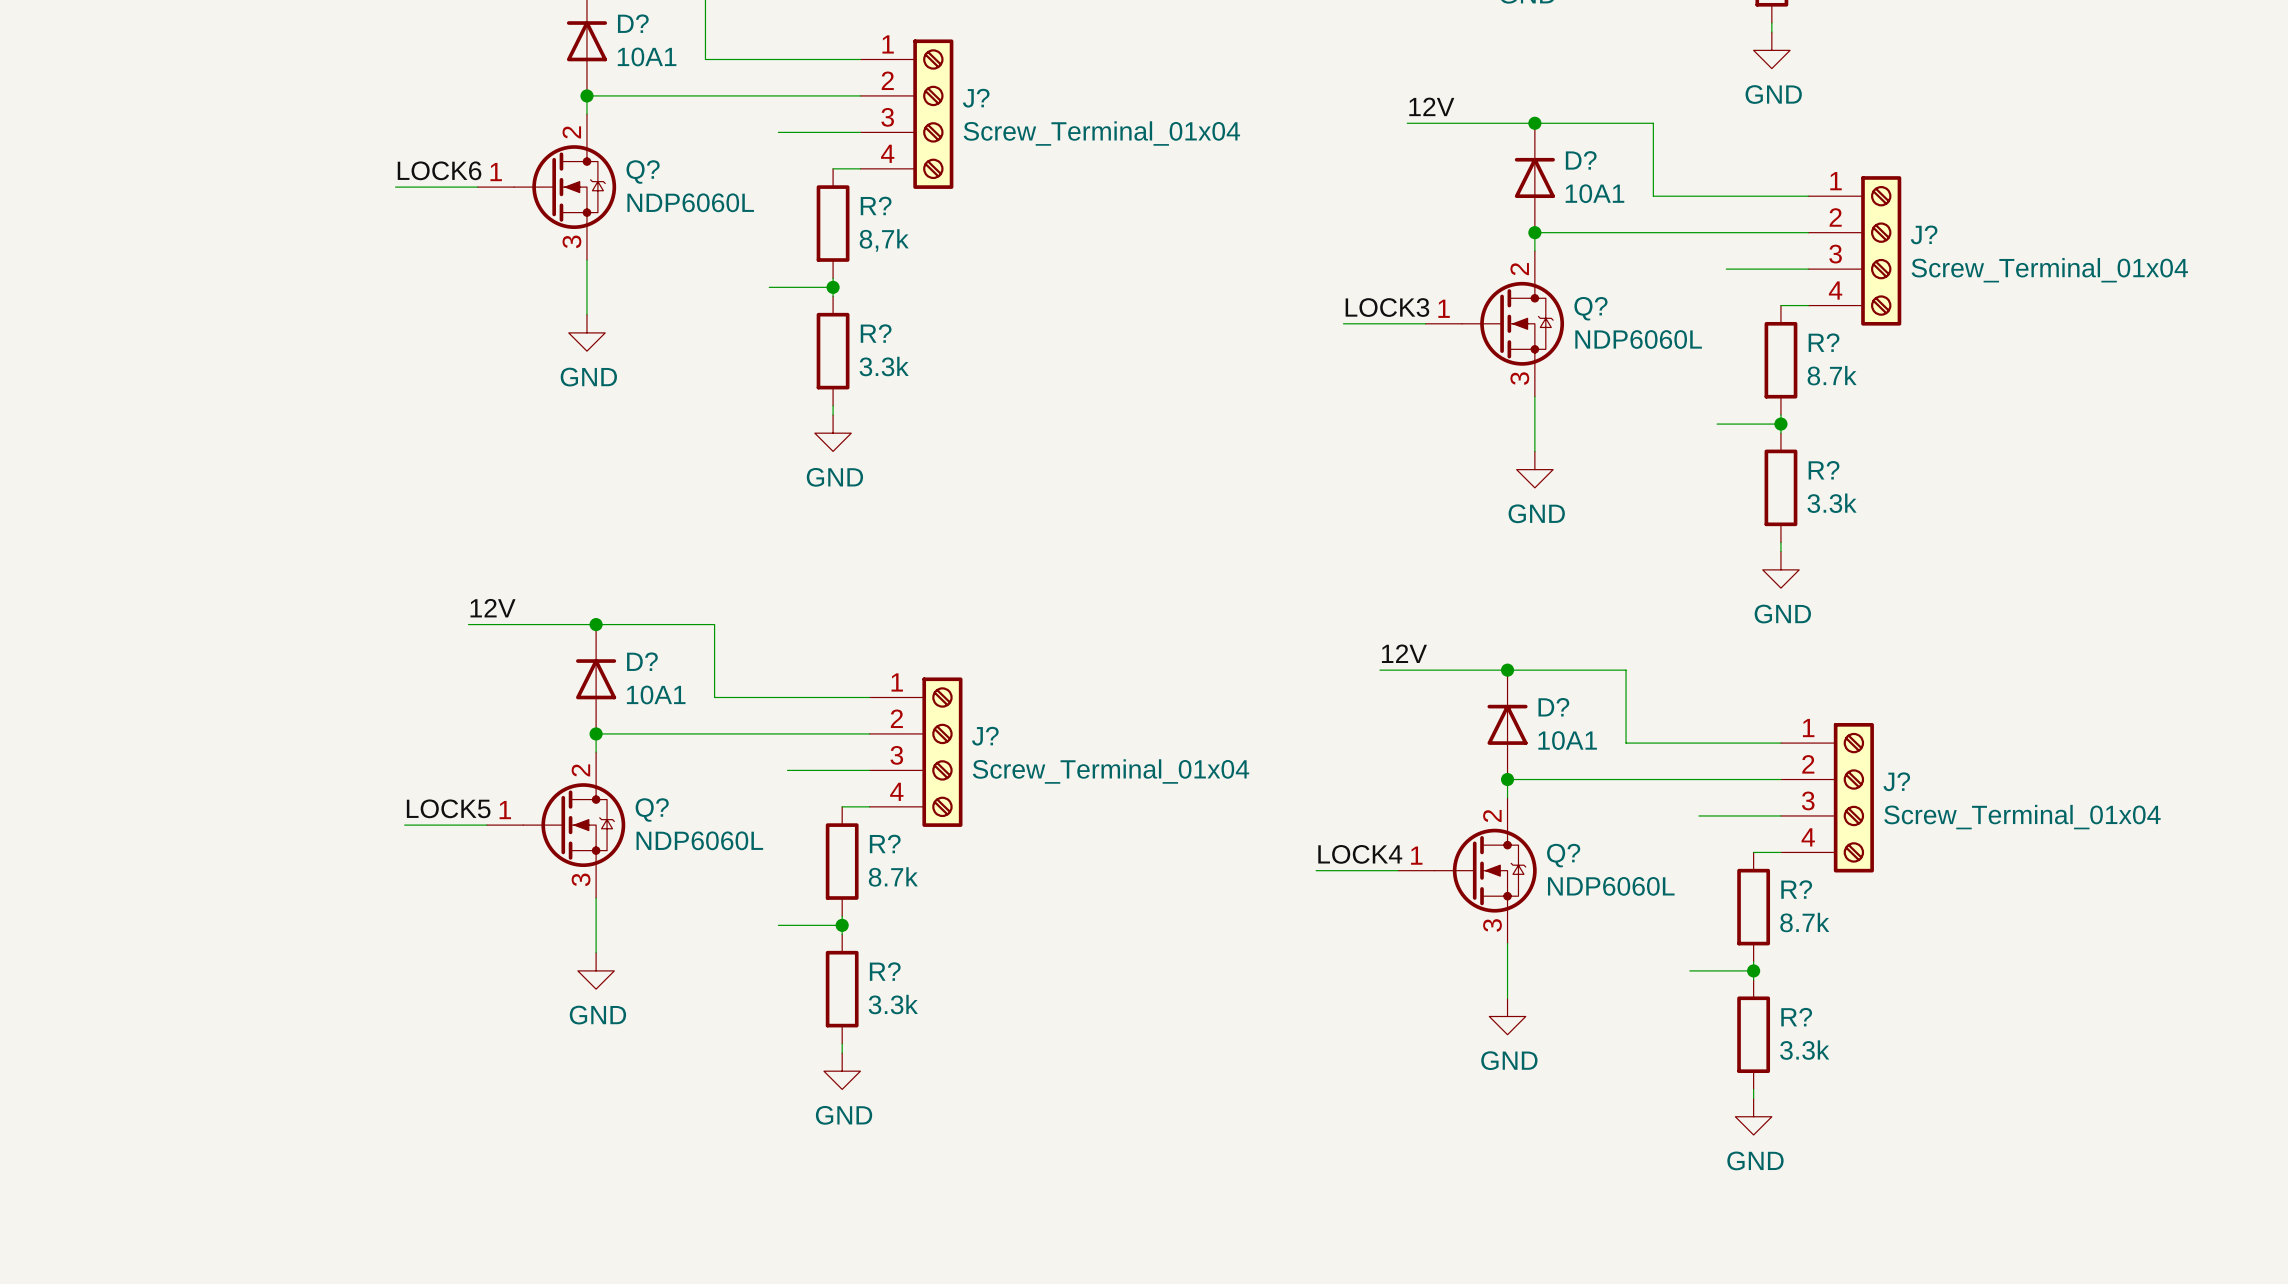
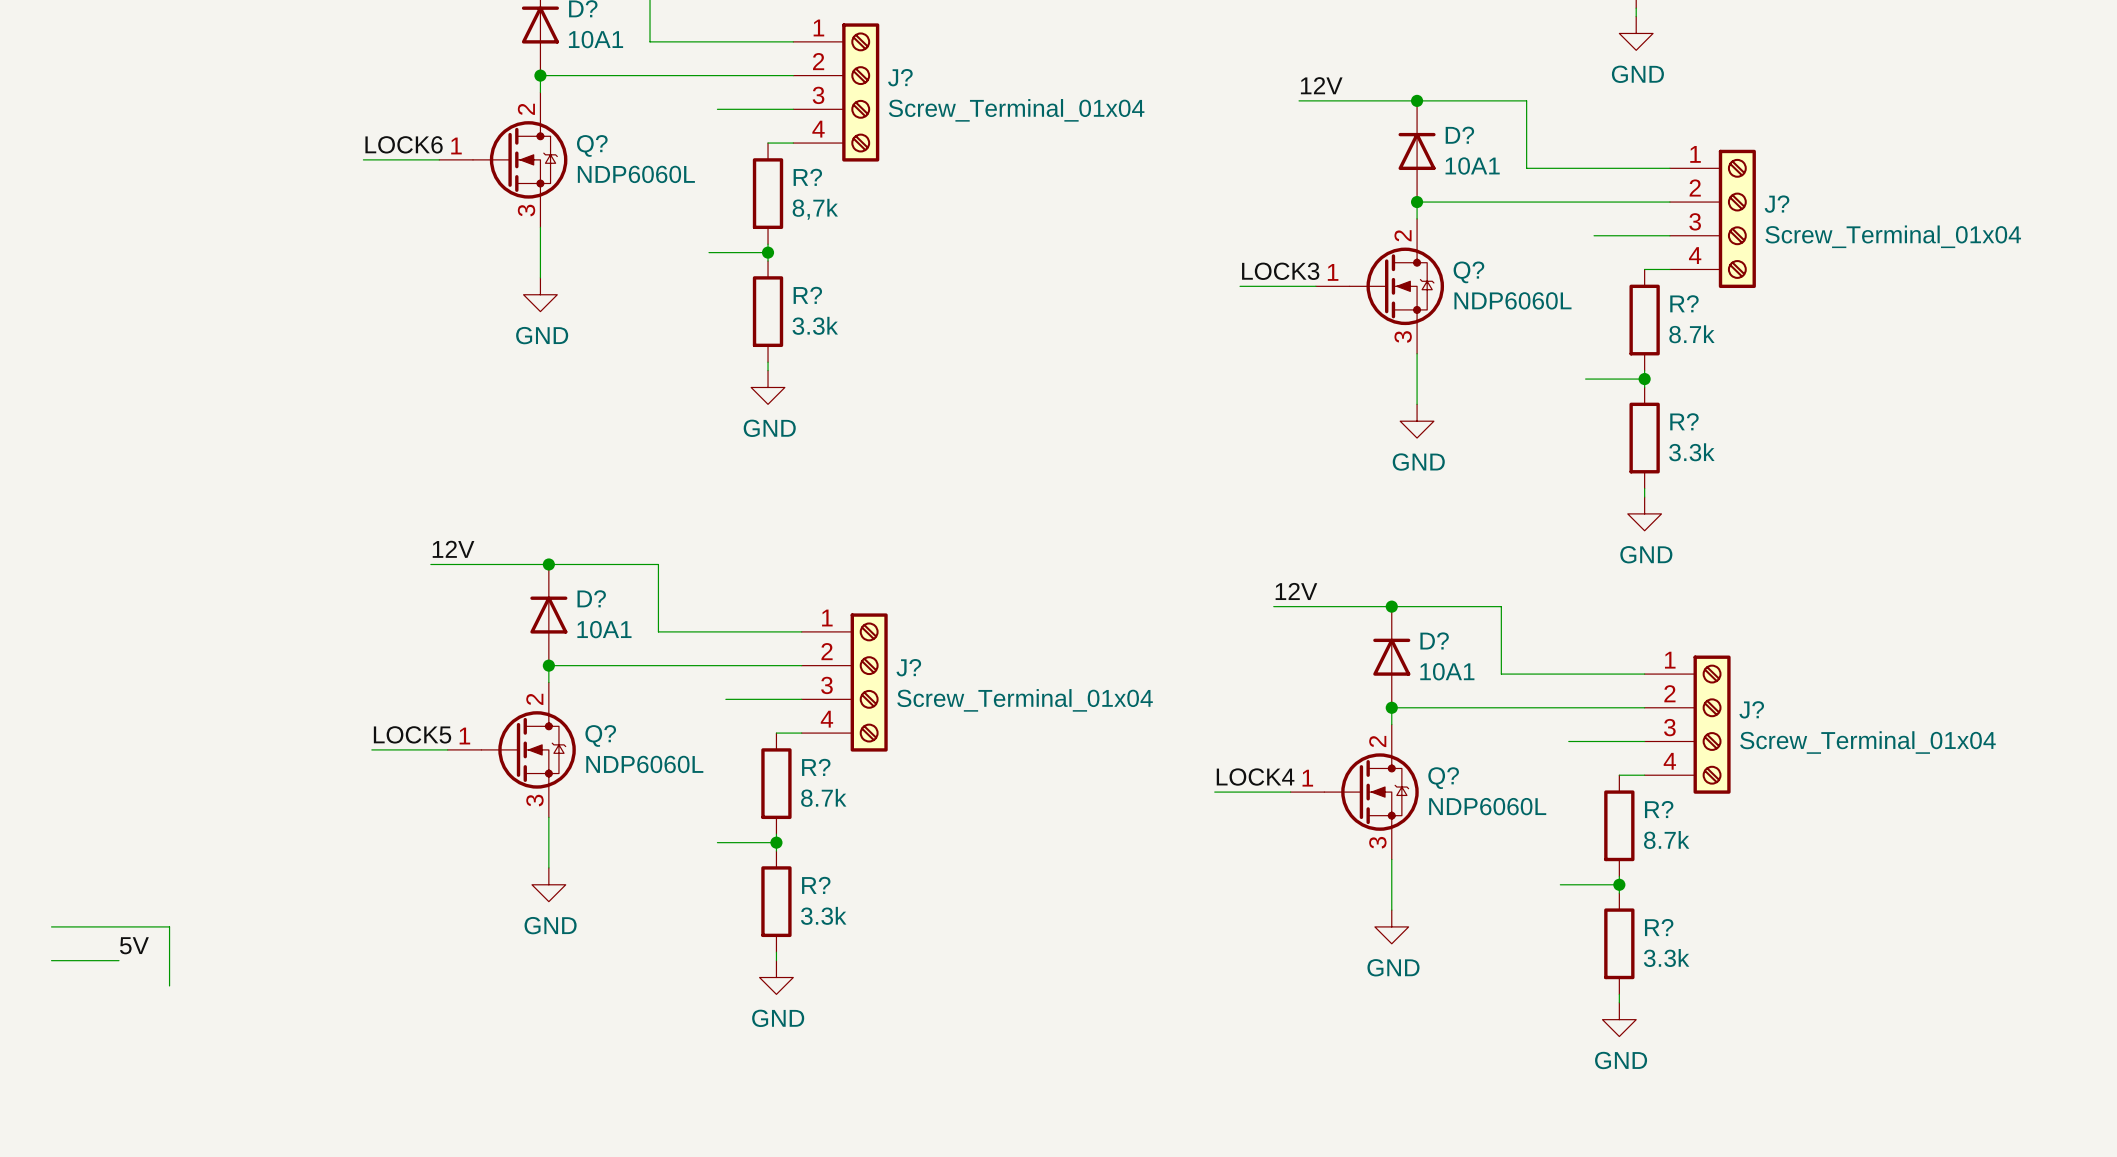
wire: none -> (51, 926) (169, 926) (169, 985)
label: none -> 5V (134, 945)
wire: none -> (51, 960) (118, 960)

